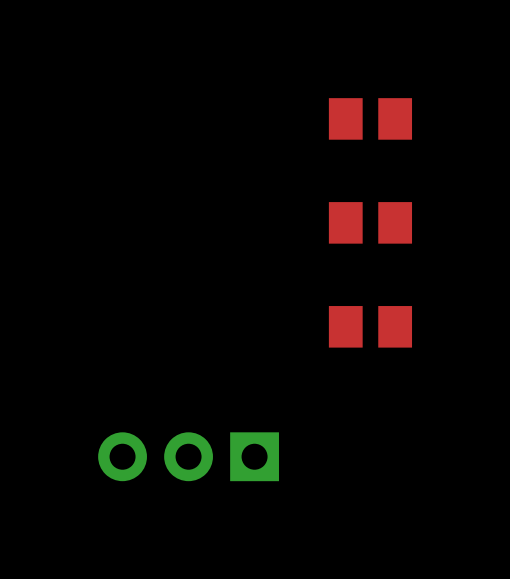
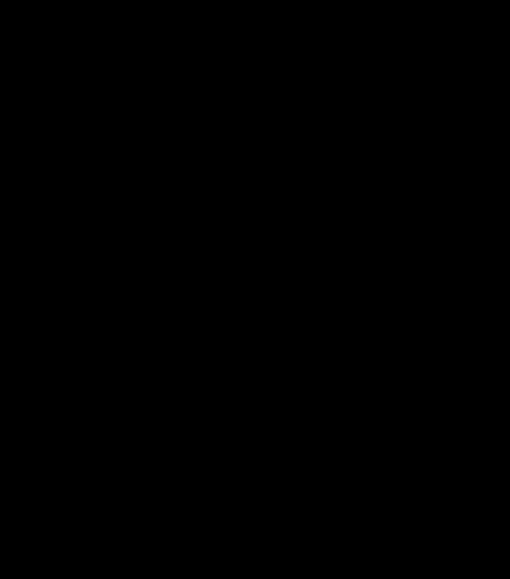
part: (370, 118) -> none
part: (370, 222) -> none
part: (370, 326) -> none
part: (188, 456) -> none

